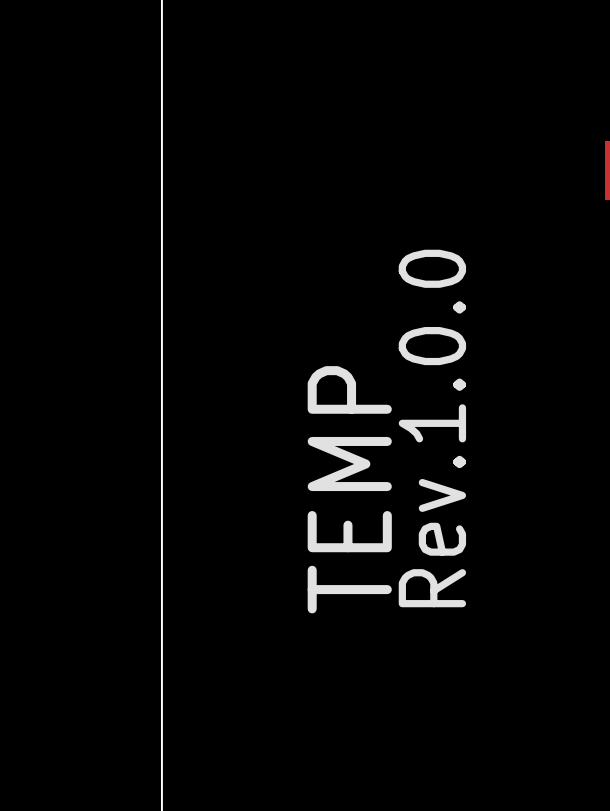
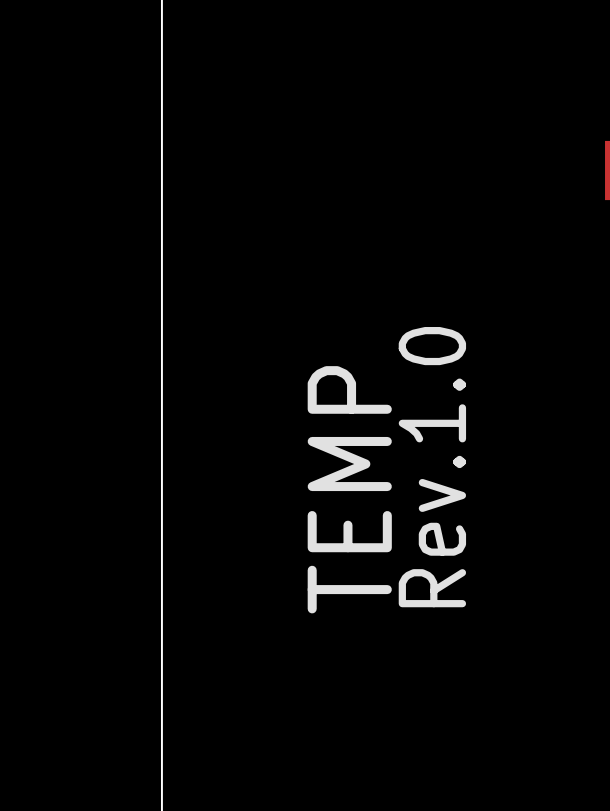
text: Rev.1.0.0 (432, 428) -> Rev.1.0 (432, 467)

